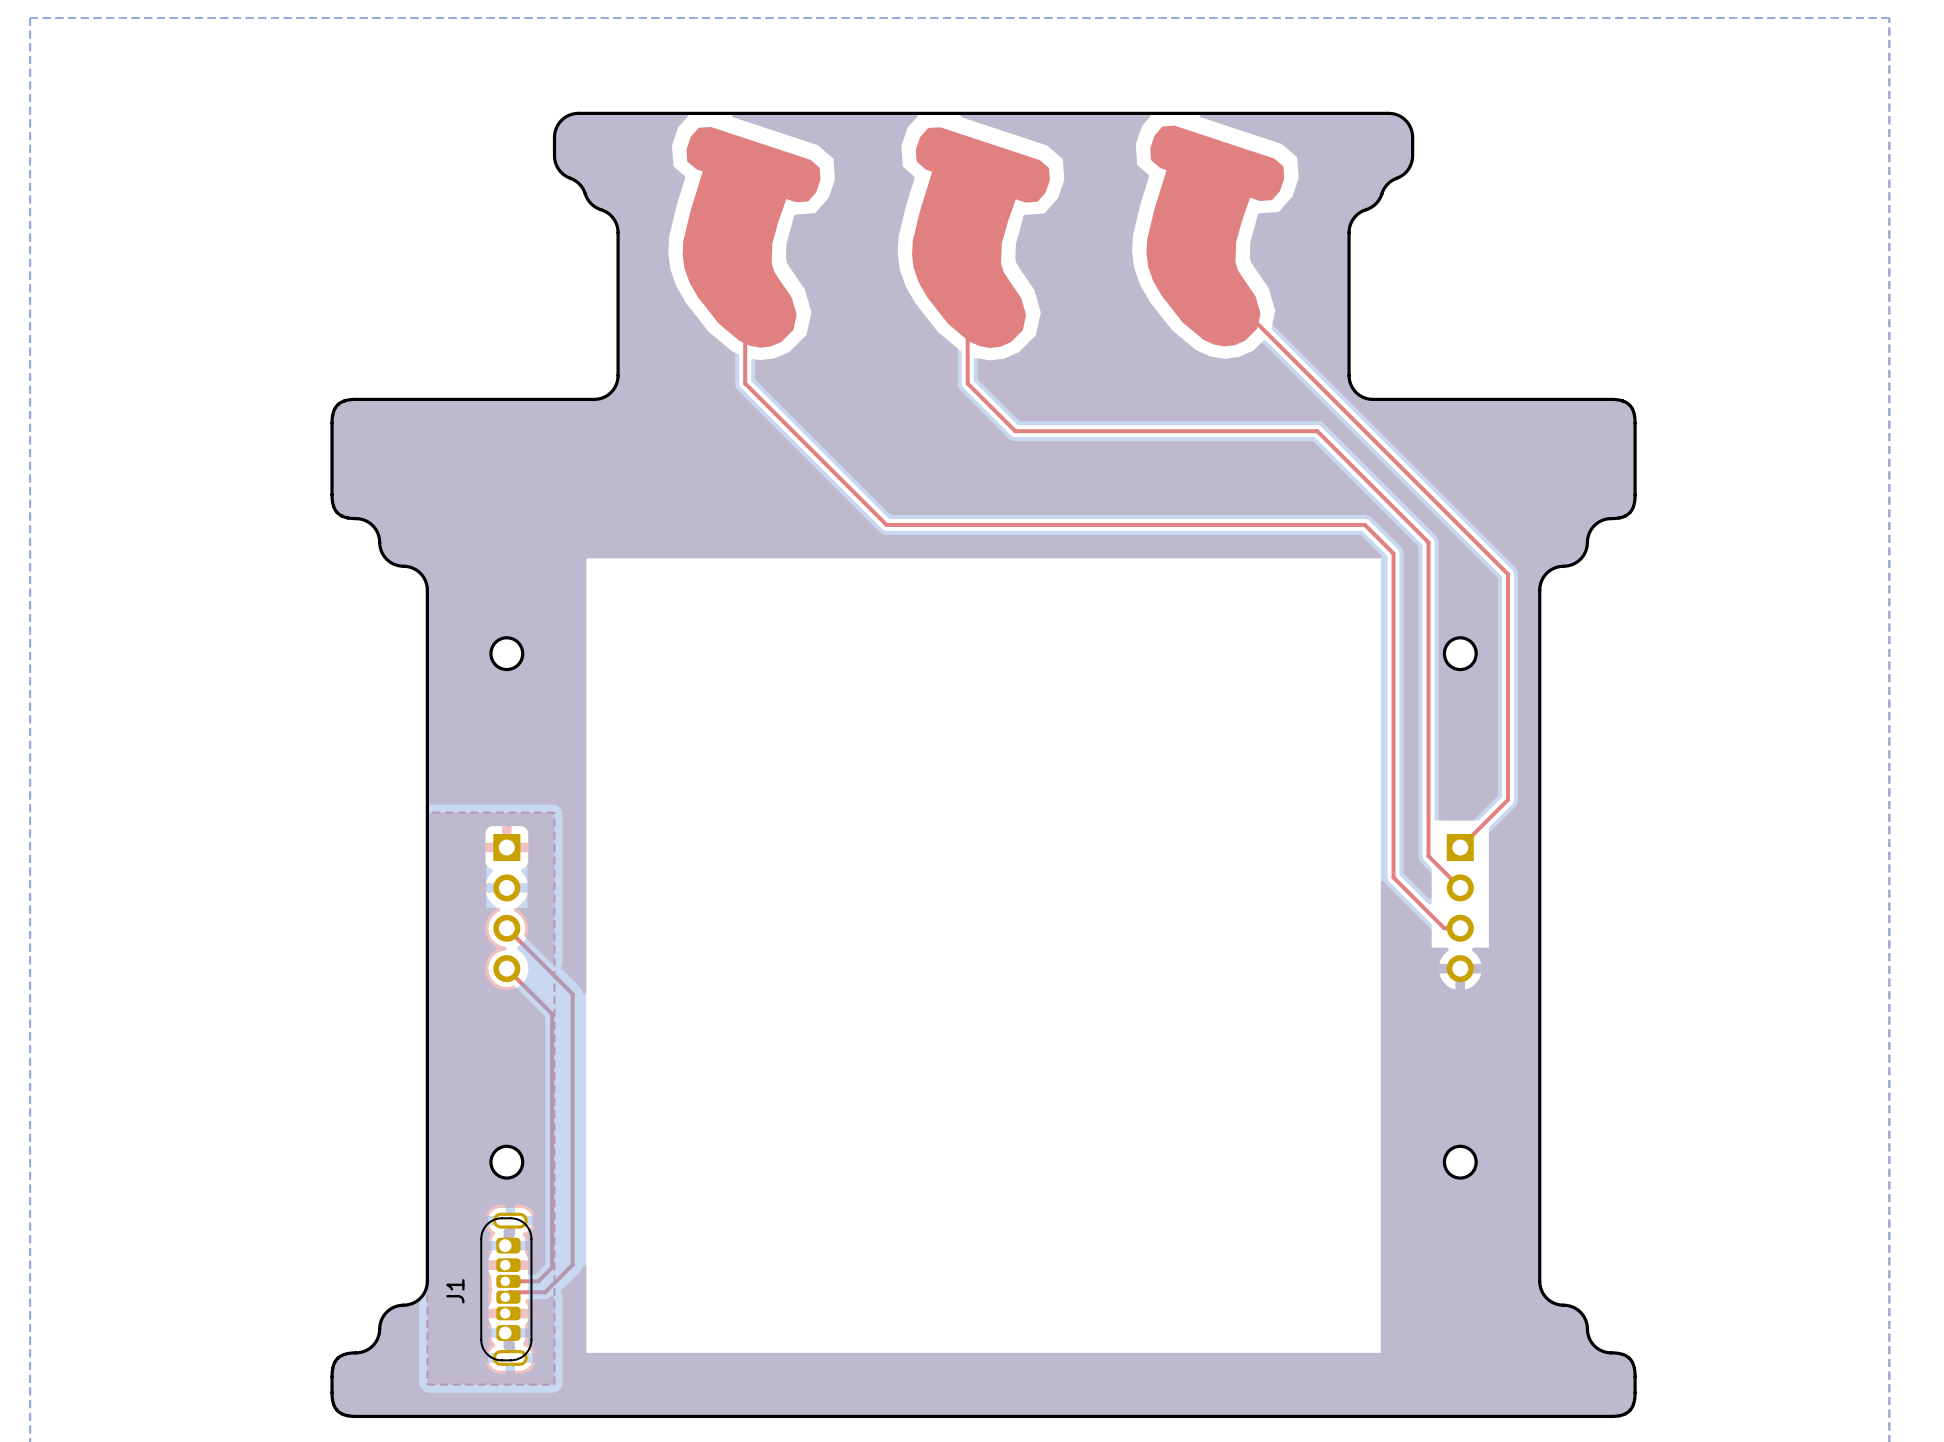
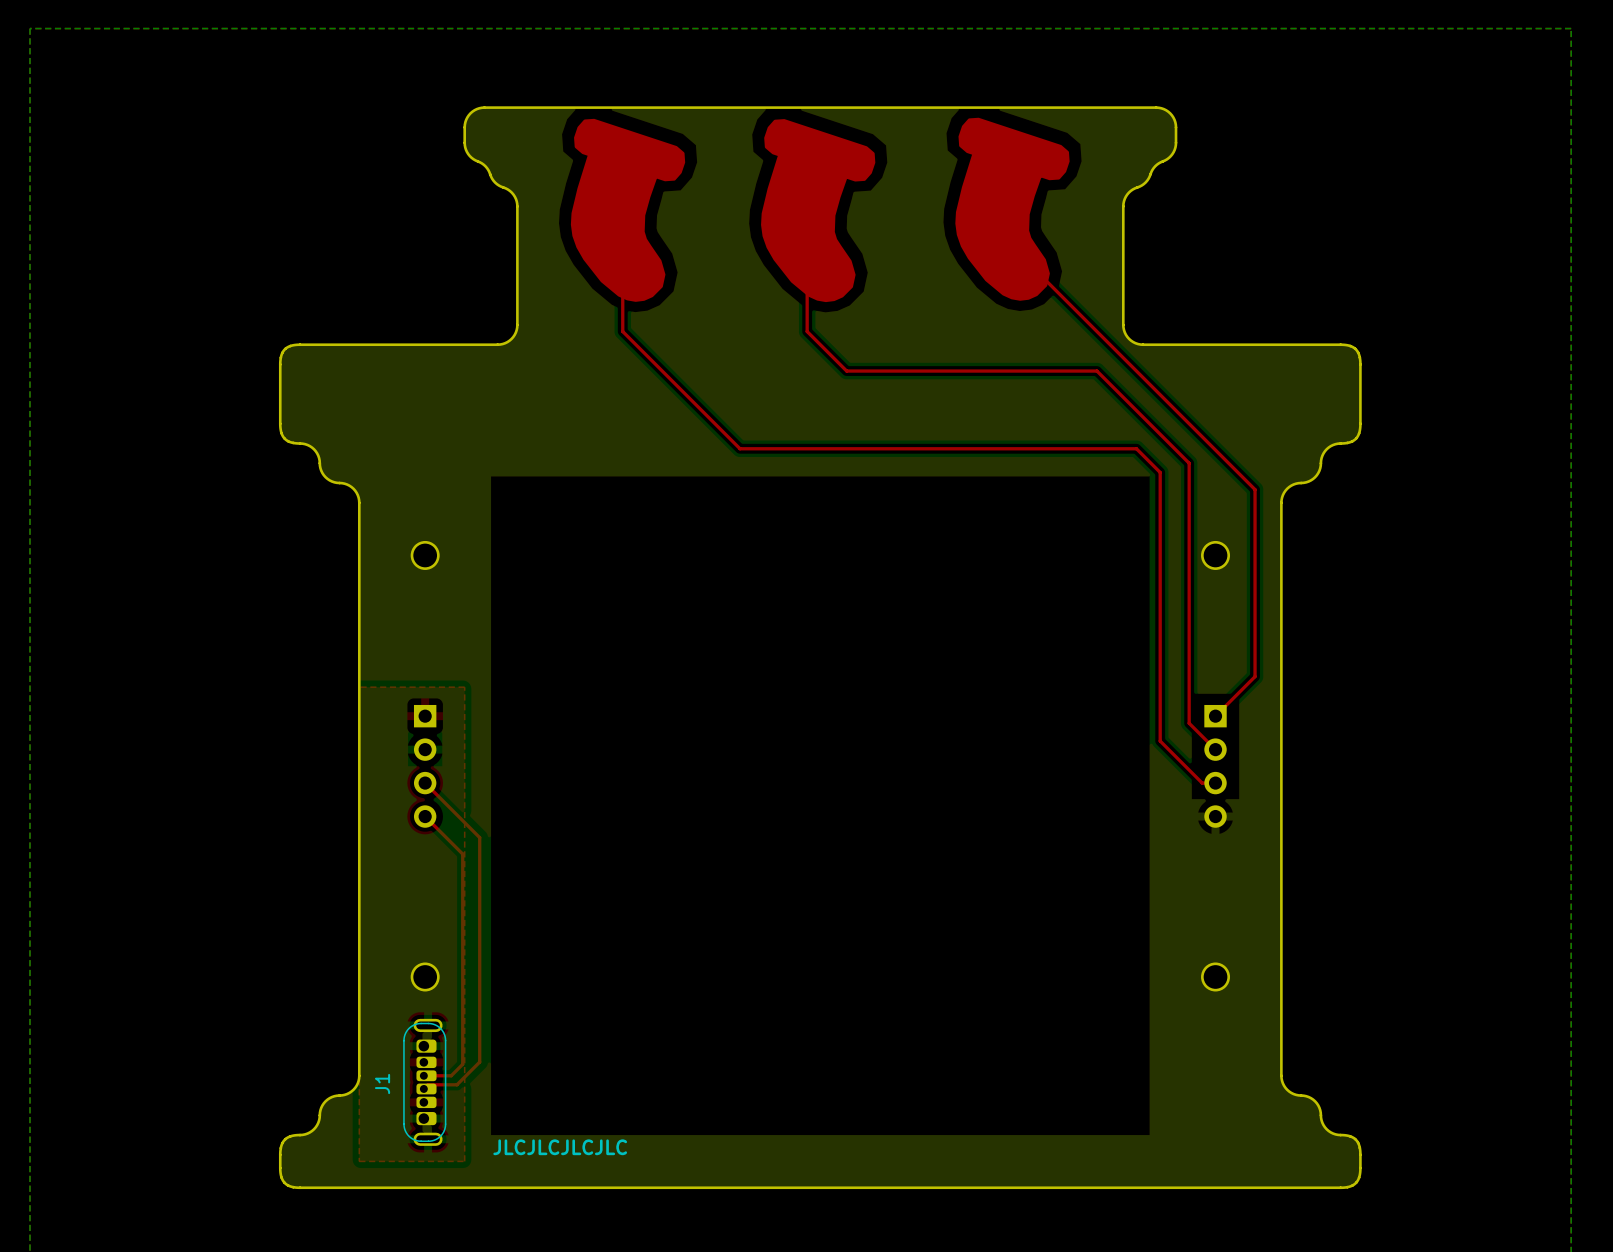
text: none -> JLCJLCJLCJLC (560, 1147)

